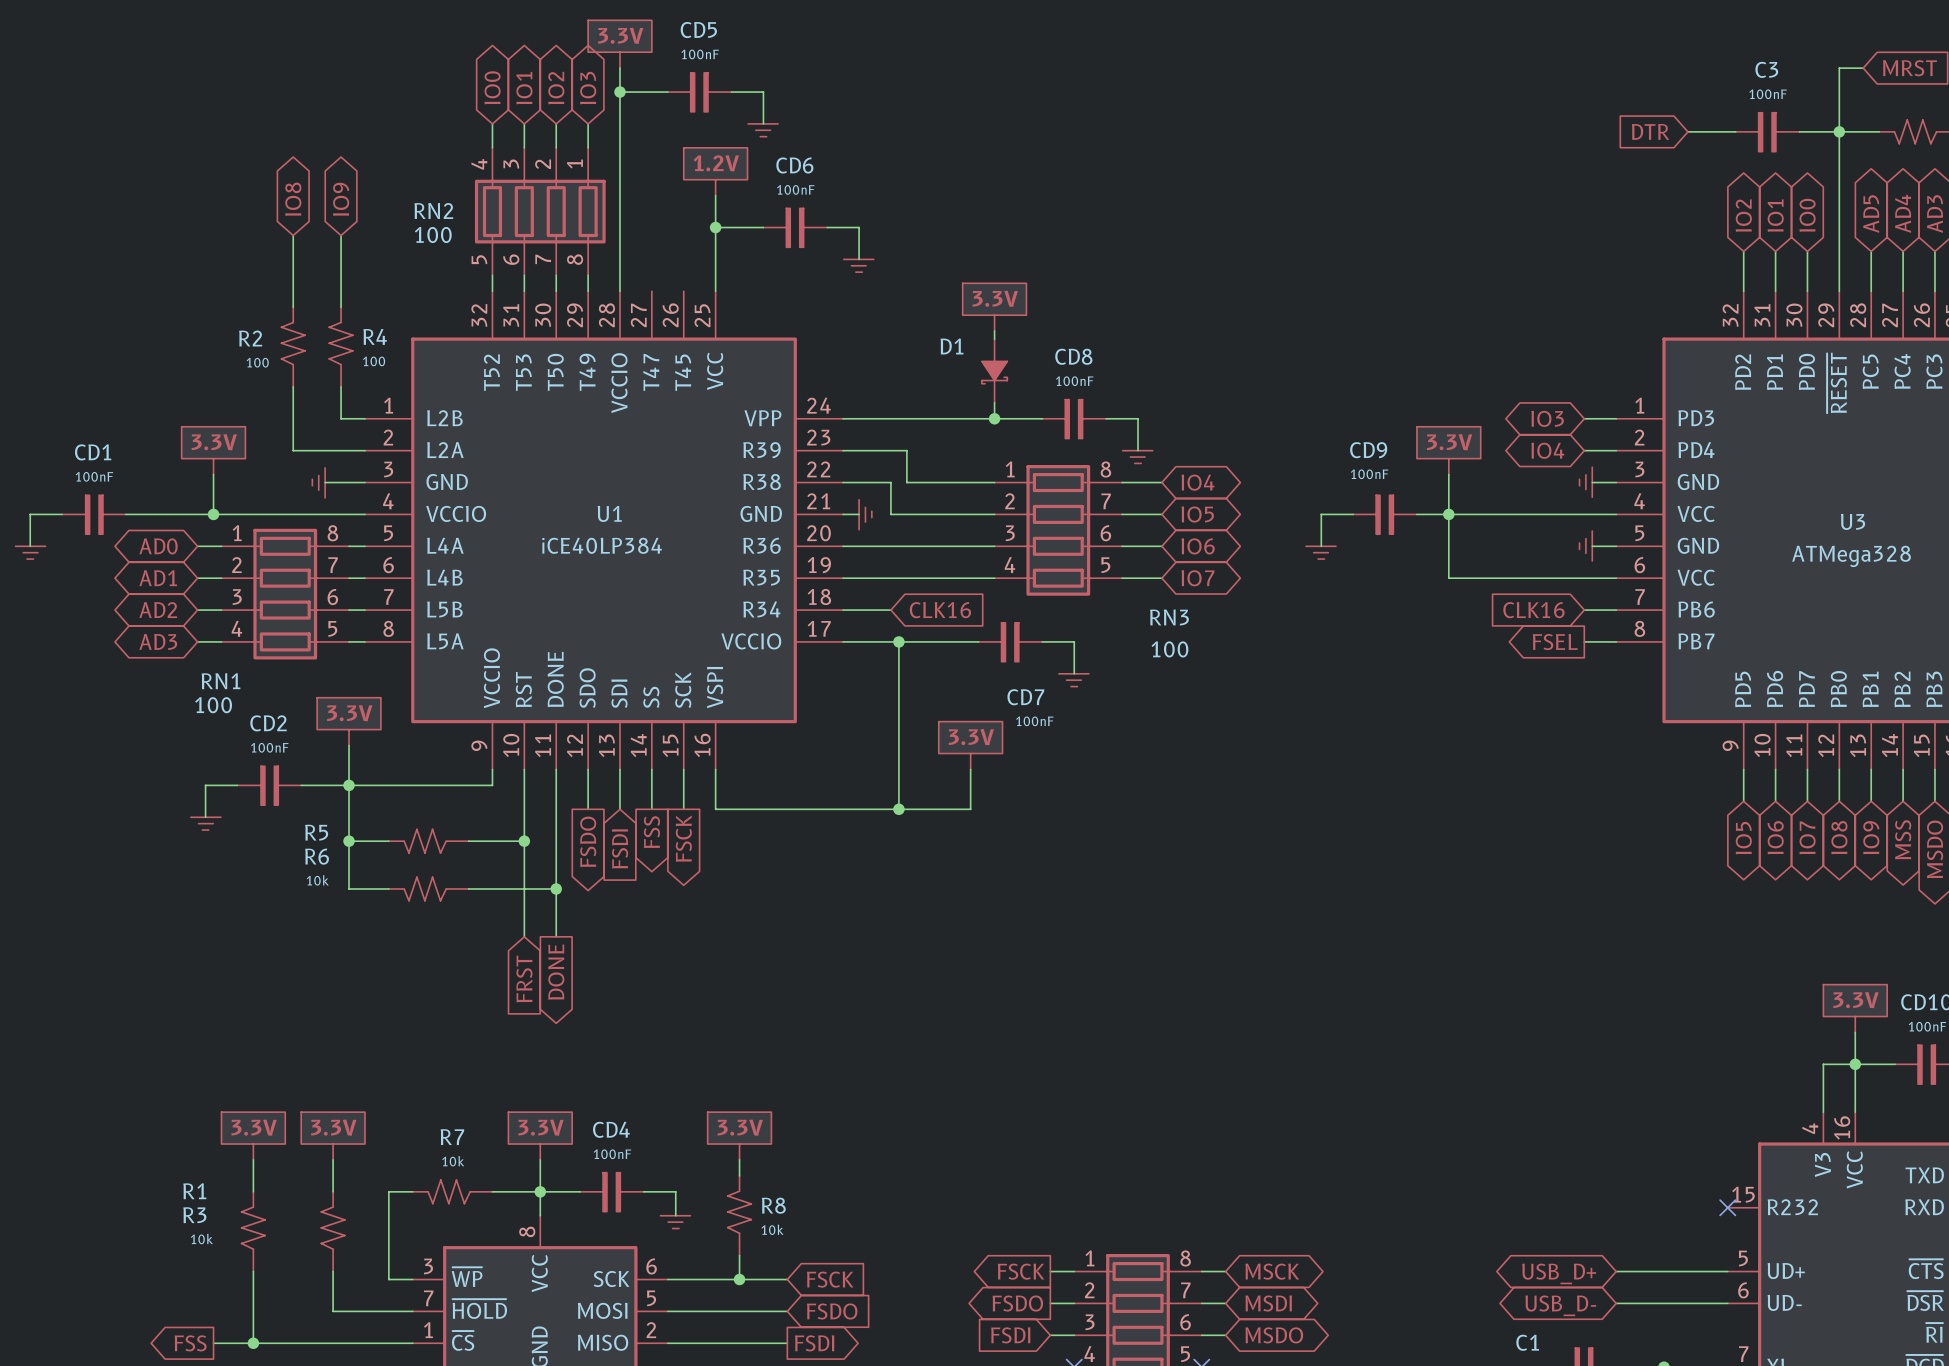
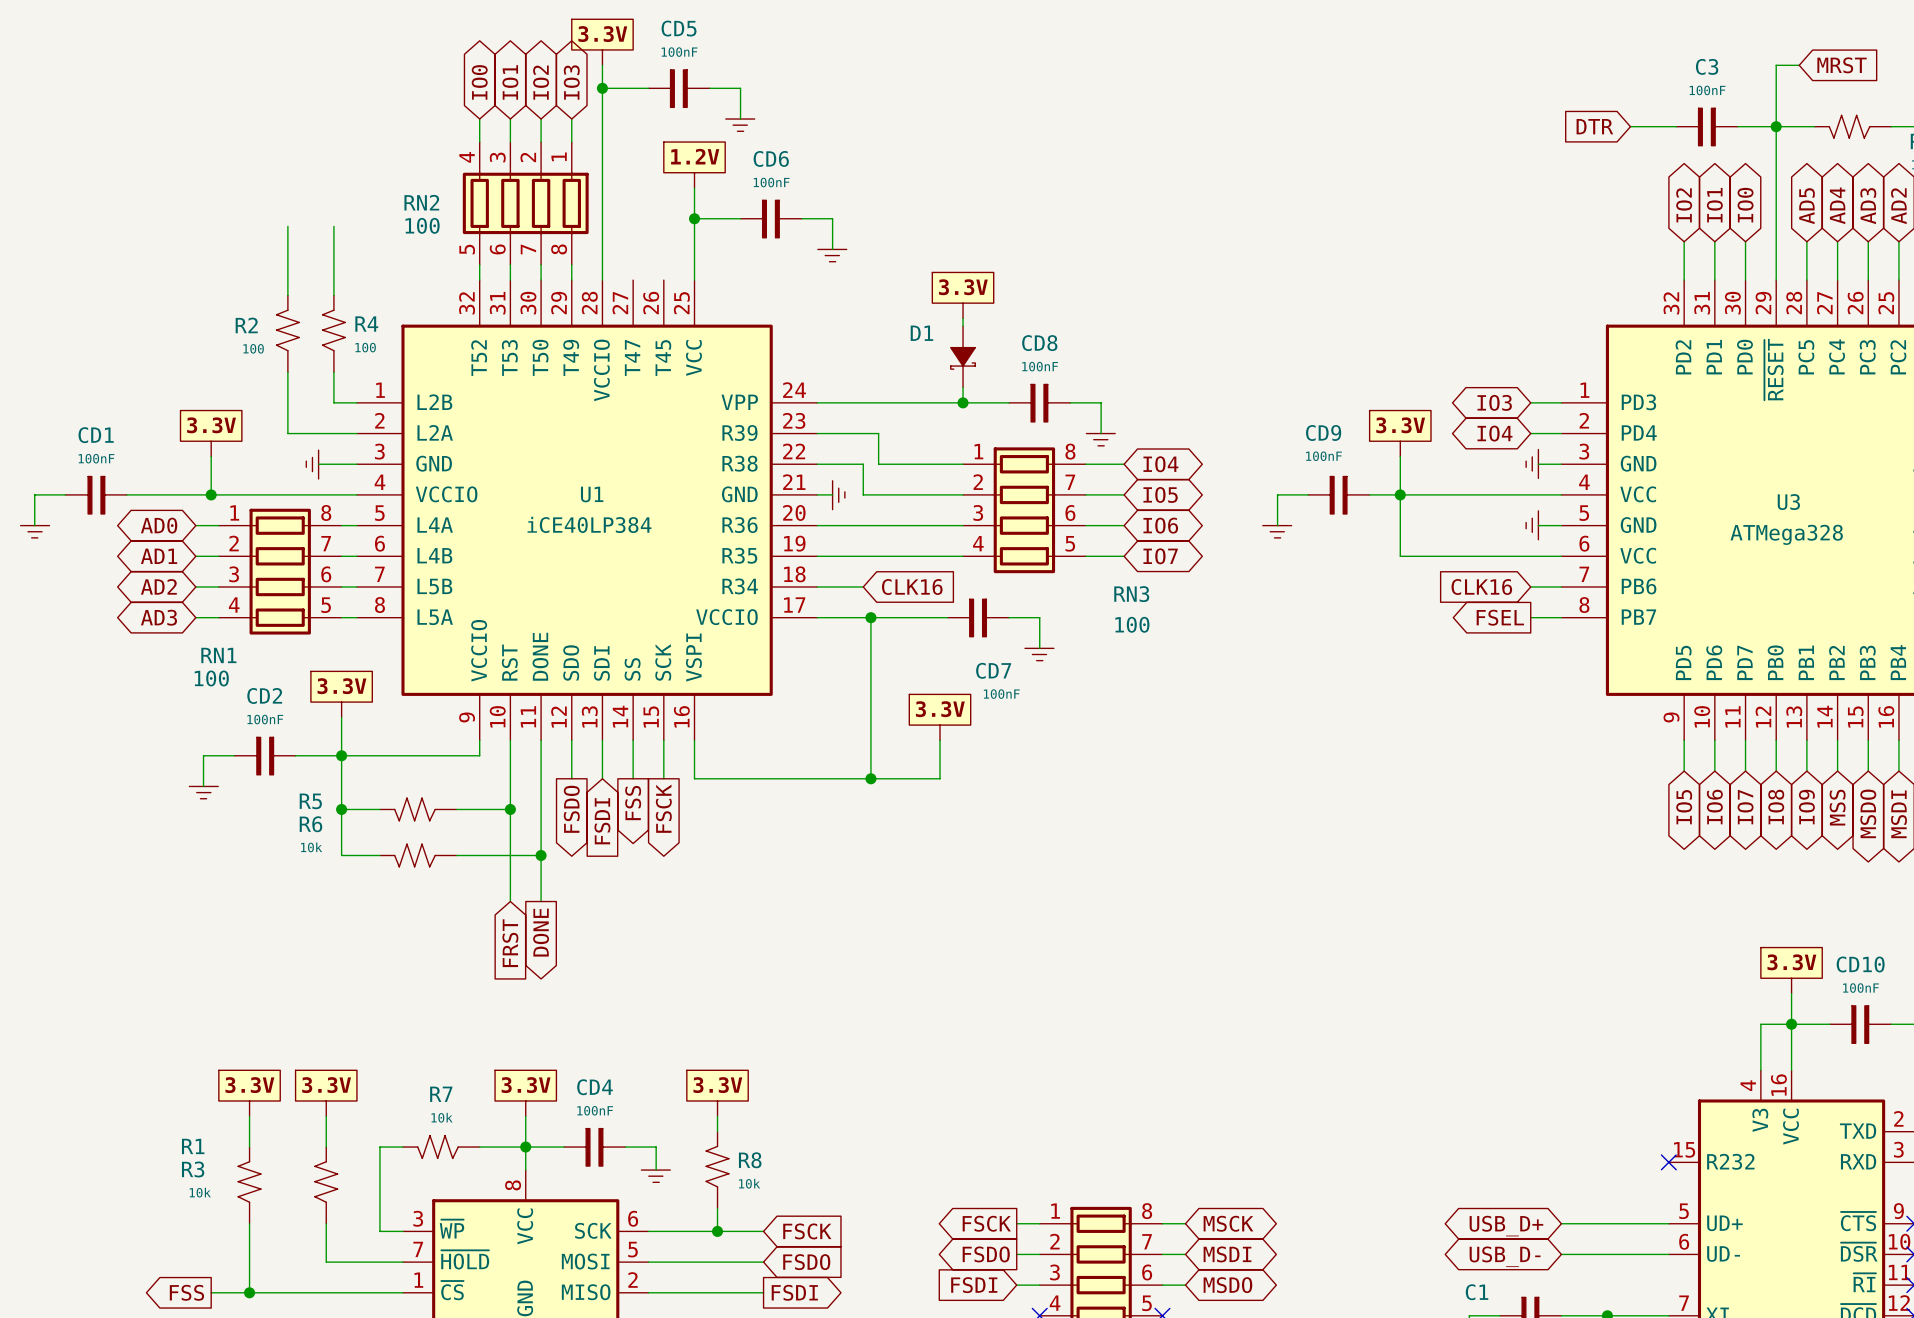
global label: IO8 (293, 199) -> none
global label: IO9 (341, 199) -> none

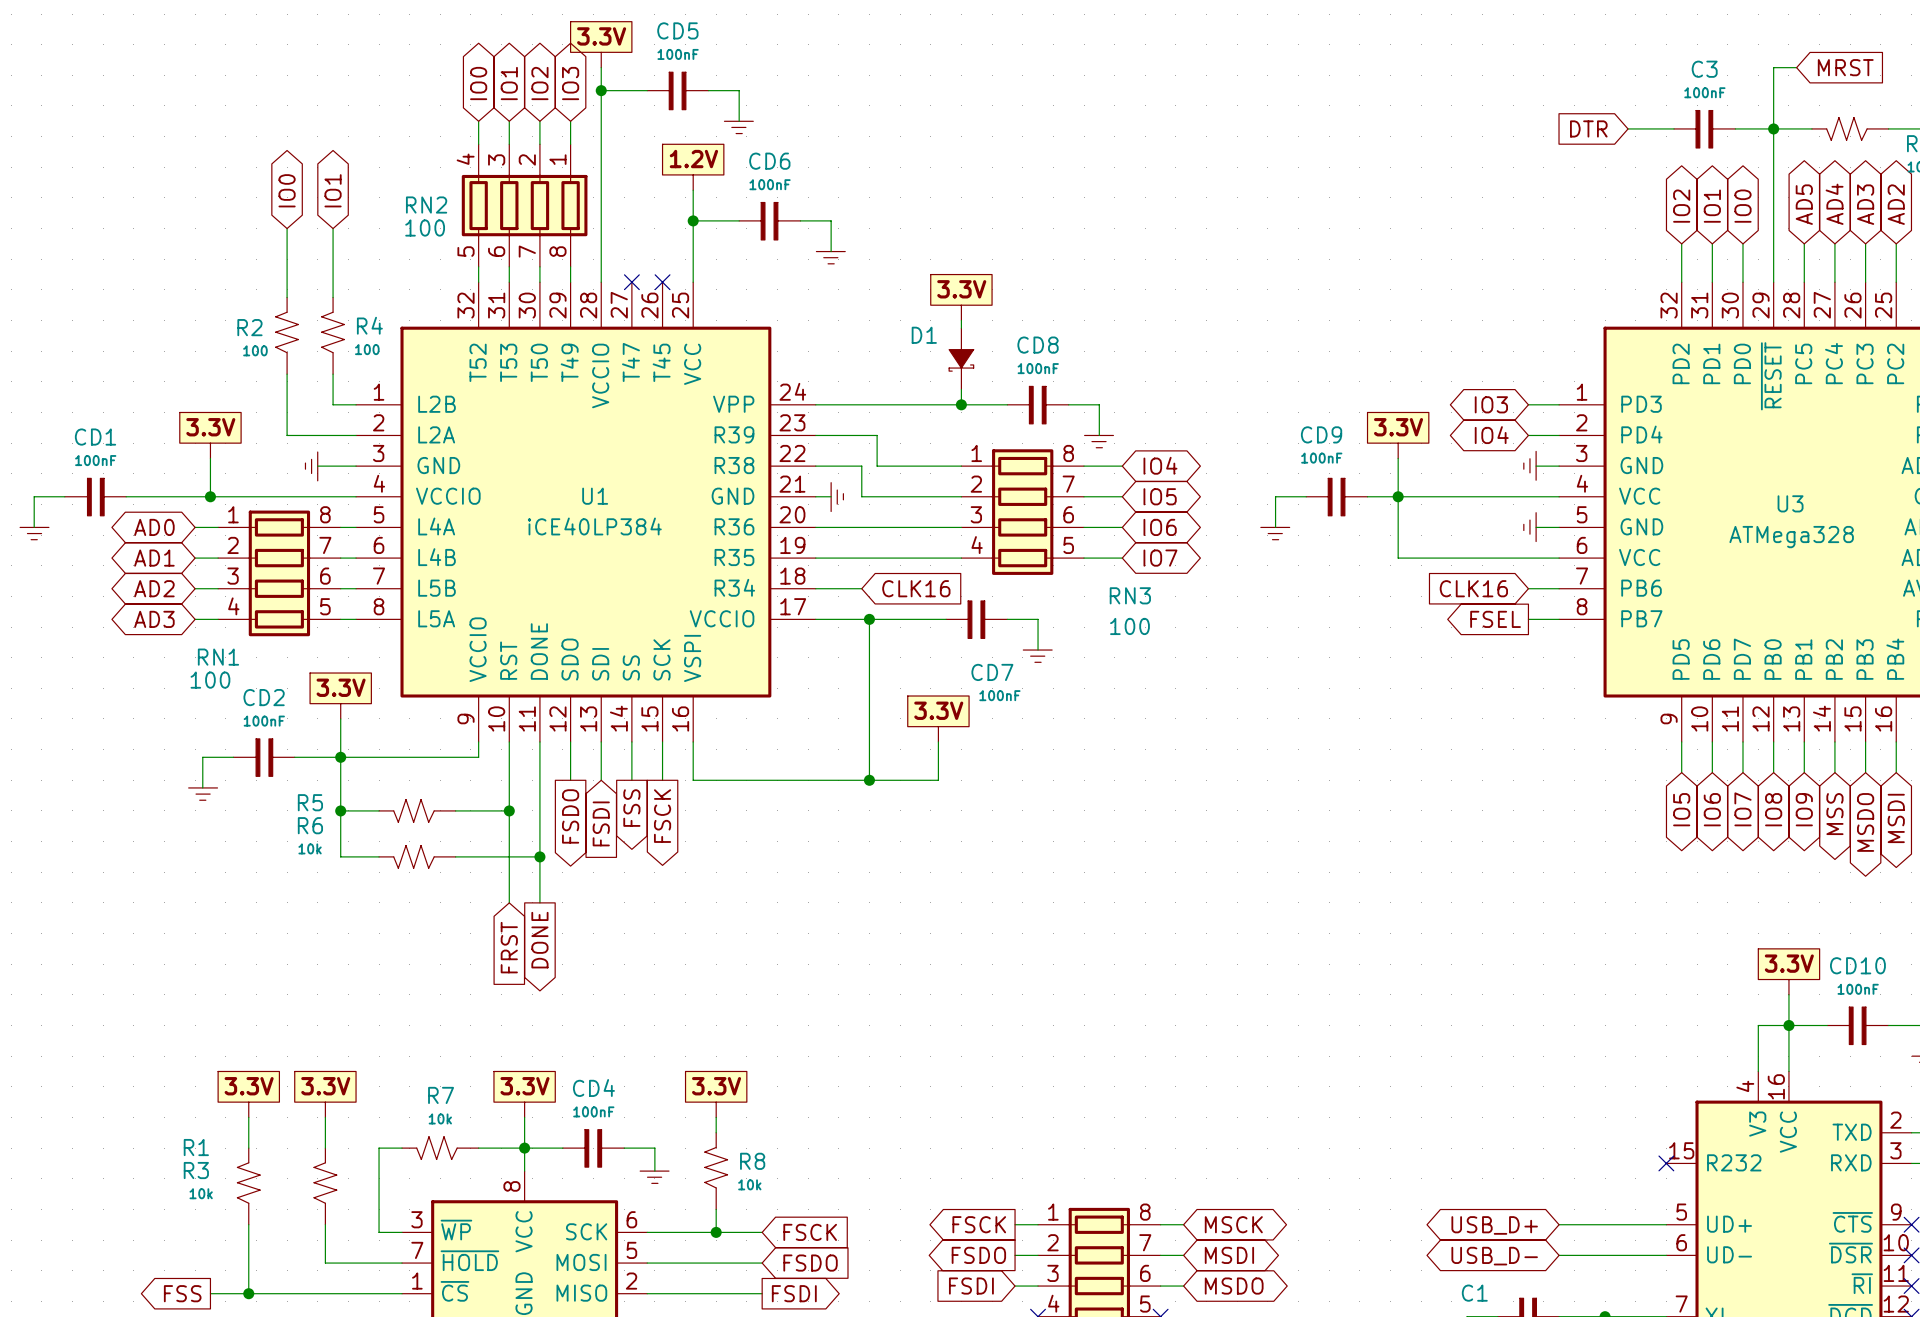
global label: none -> IO0 (287, 190)
global label: none -> IO1 (333, 190)
no-connect mark: none -> (631, 282)
no-connect mark: none -> (662, 282)

